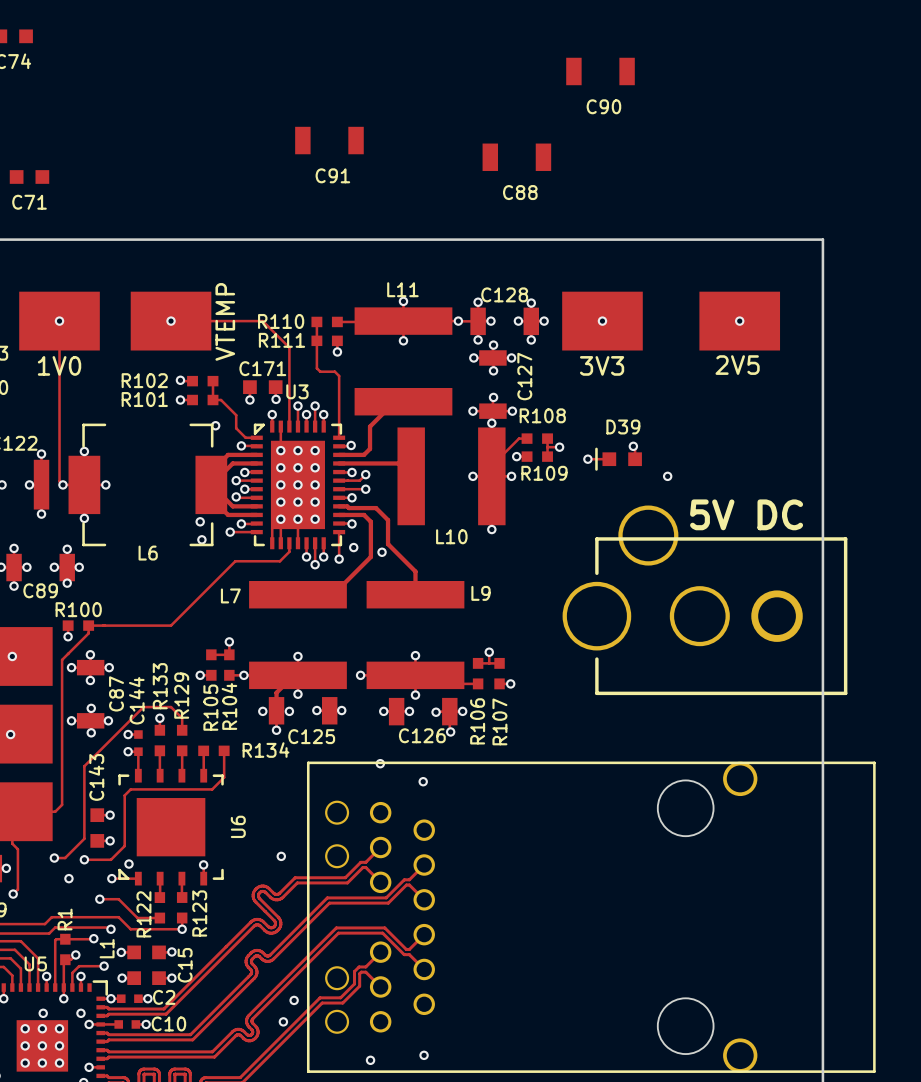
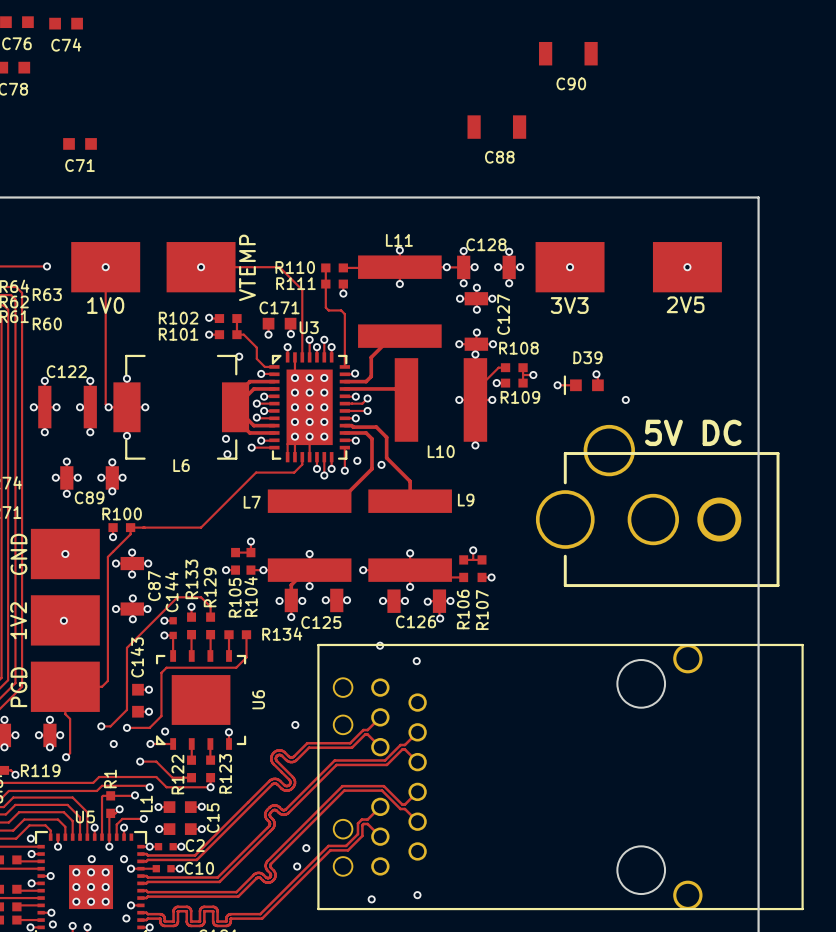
C91: (329, 140) -> none

